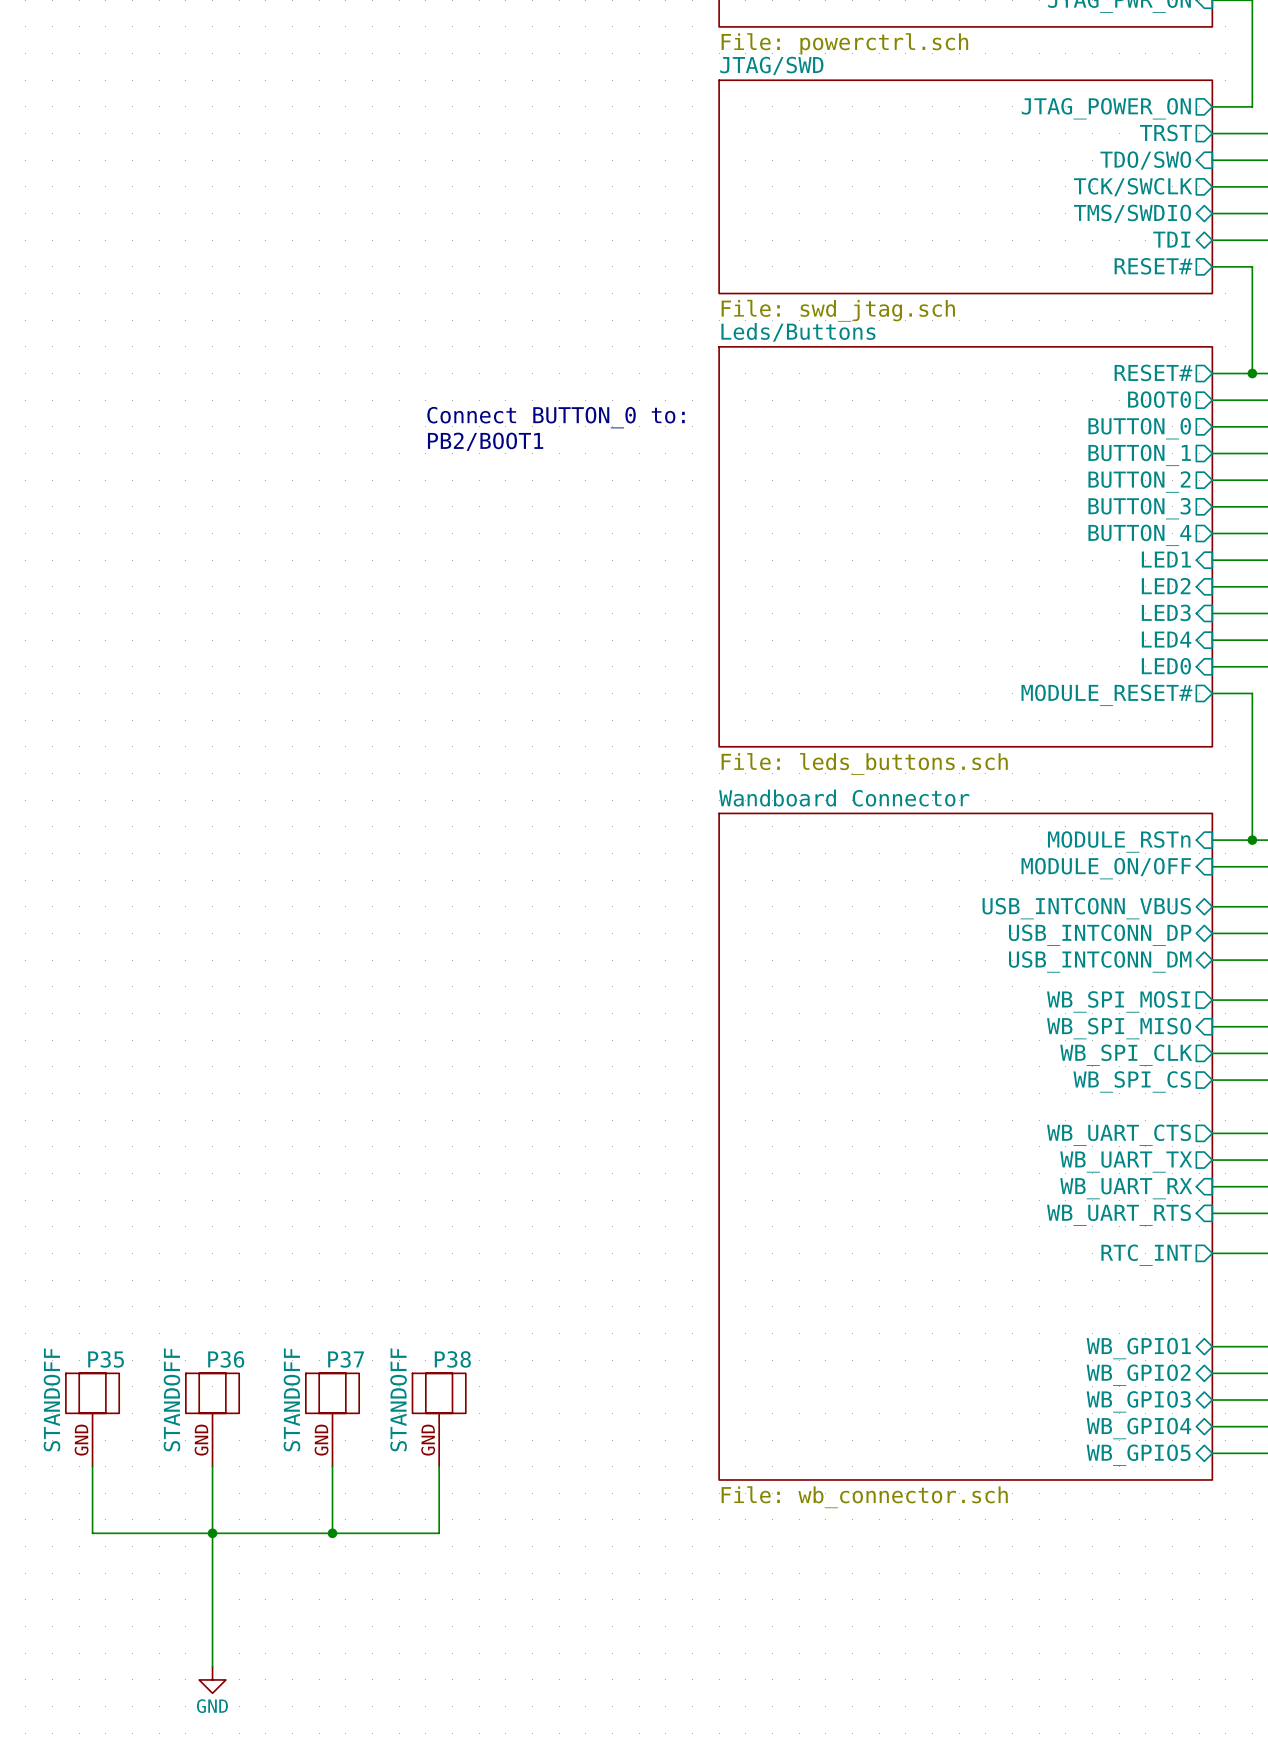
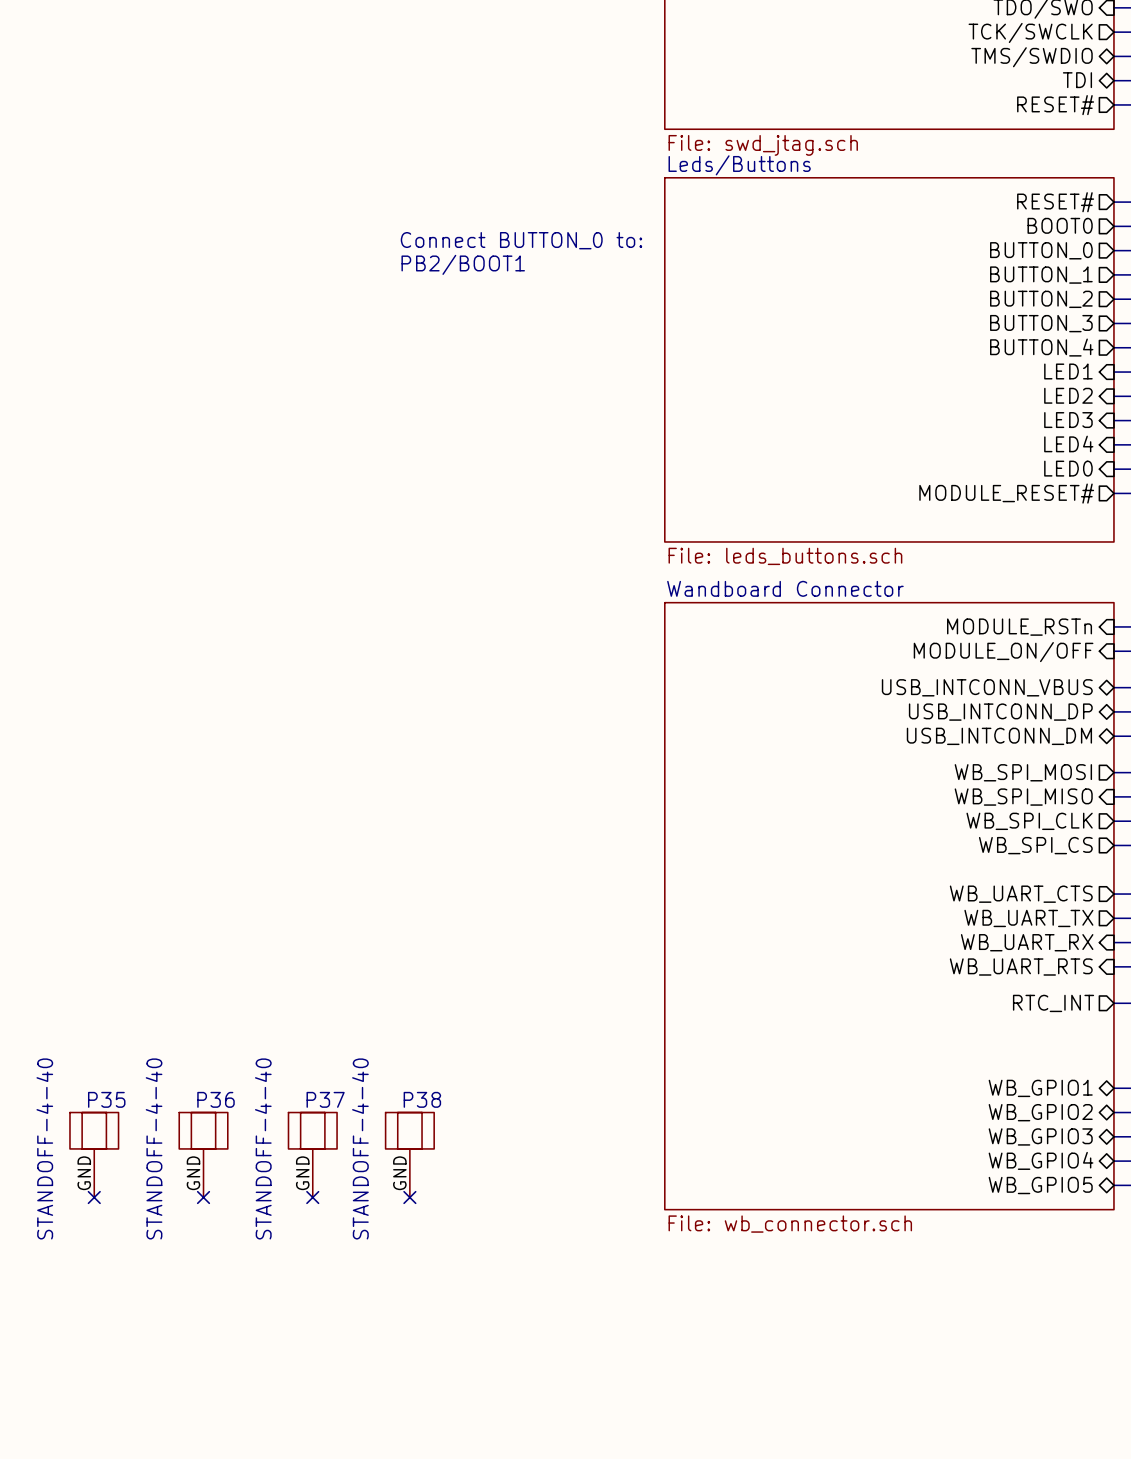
P35 value: STANDOFF (51, 1399) -> STANDOFF-4-40 (44, 1148)
P36 value: STANDOFF (171, 1399) -> STANDOFF-4-40 (154, 1148)
P37 value: STANDOFF (291, 1399) -> STANDOFF-4-40 (263, 1148)
P38 value: STANDOFF (398, 1399) -> STANDOFF-4-40 (360, 1148)
wire: (92, 1466) (92, 1533) (439, 1533) (439, 1466) -> none
no-connect mark: none -> (94, 1197)
wire: (212, 1466) (212, 1666) -> none
no-connect mark: none -> (203, 1197)
wire: (332, 1466) (332, 1533) -> none
no-connect mark: none -> (312, 1197)
no-connect mark: none -> (409, 1197)
junction: (212, 1533) -> none
junction: (332, 1533) -> none
power symbol: GND (212, 1679) -> none

